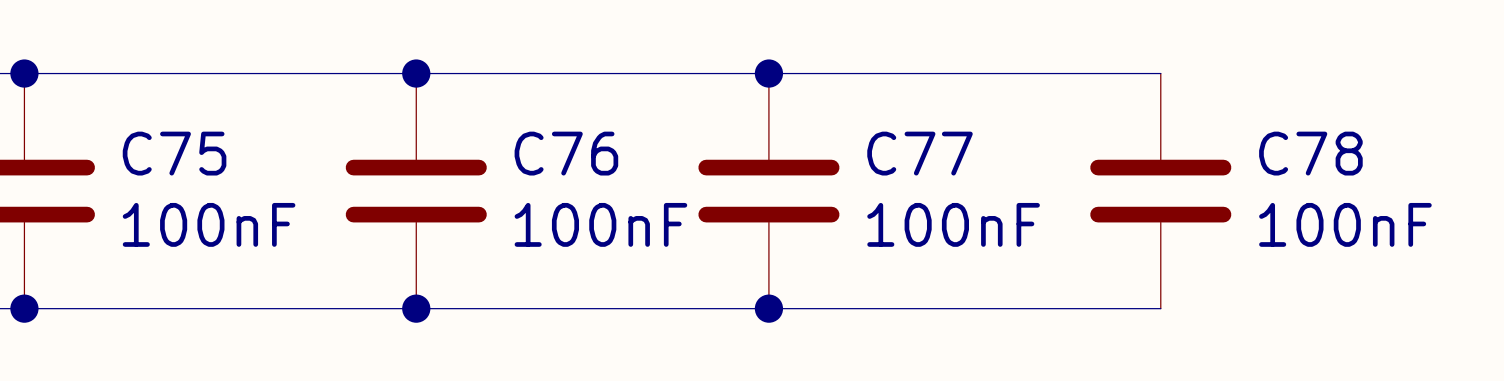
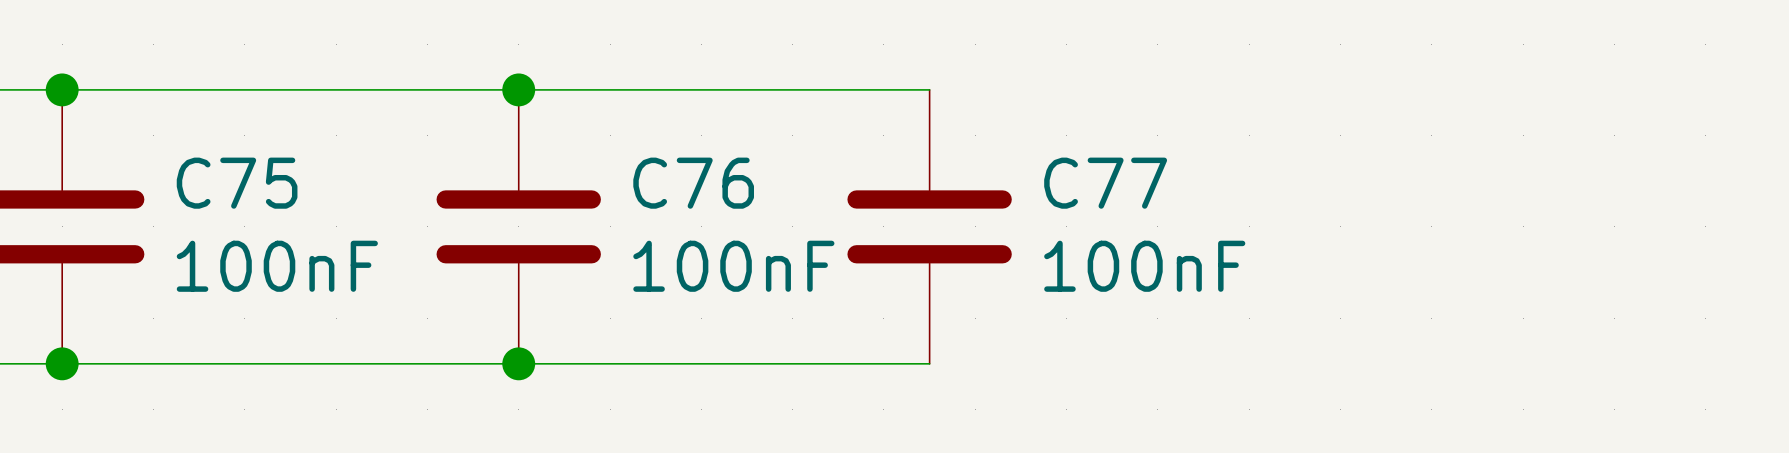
wire: (768, 73) (1160, 73) -> none
junction: (768, 73) -> none
C78: 100nF (1160, 191) -> none
wire: (768, 308) (1160, 308) -> none
junction: (768, 308) -> none

